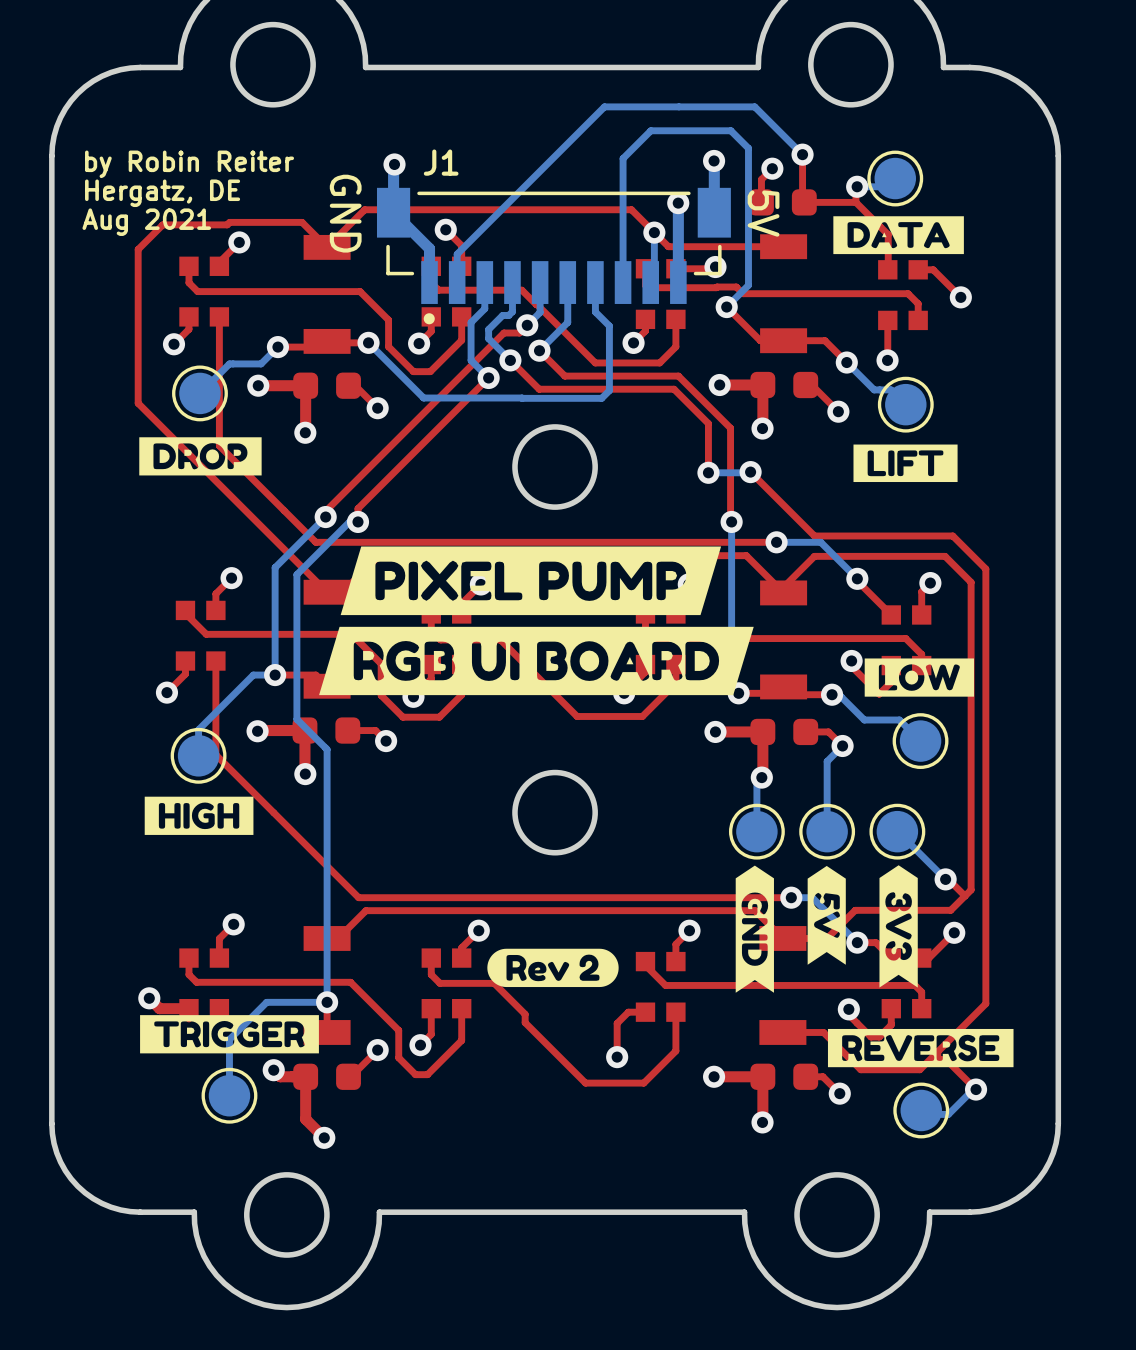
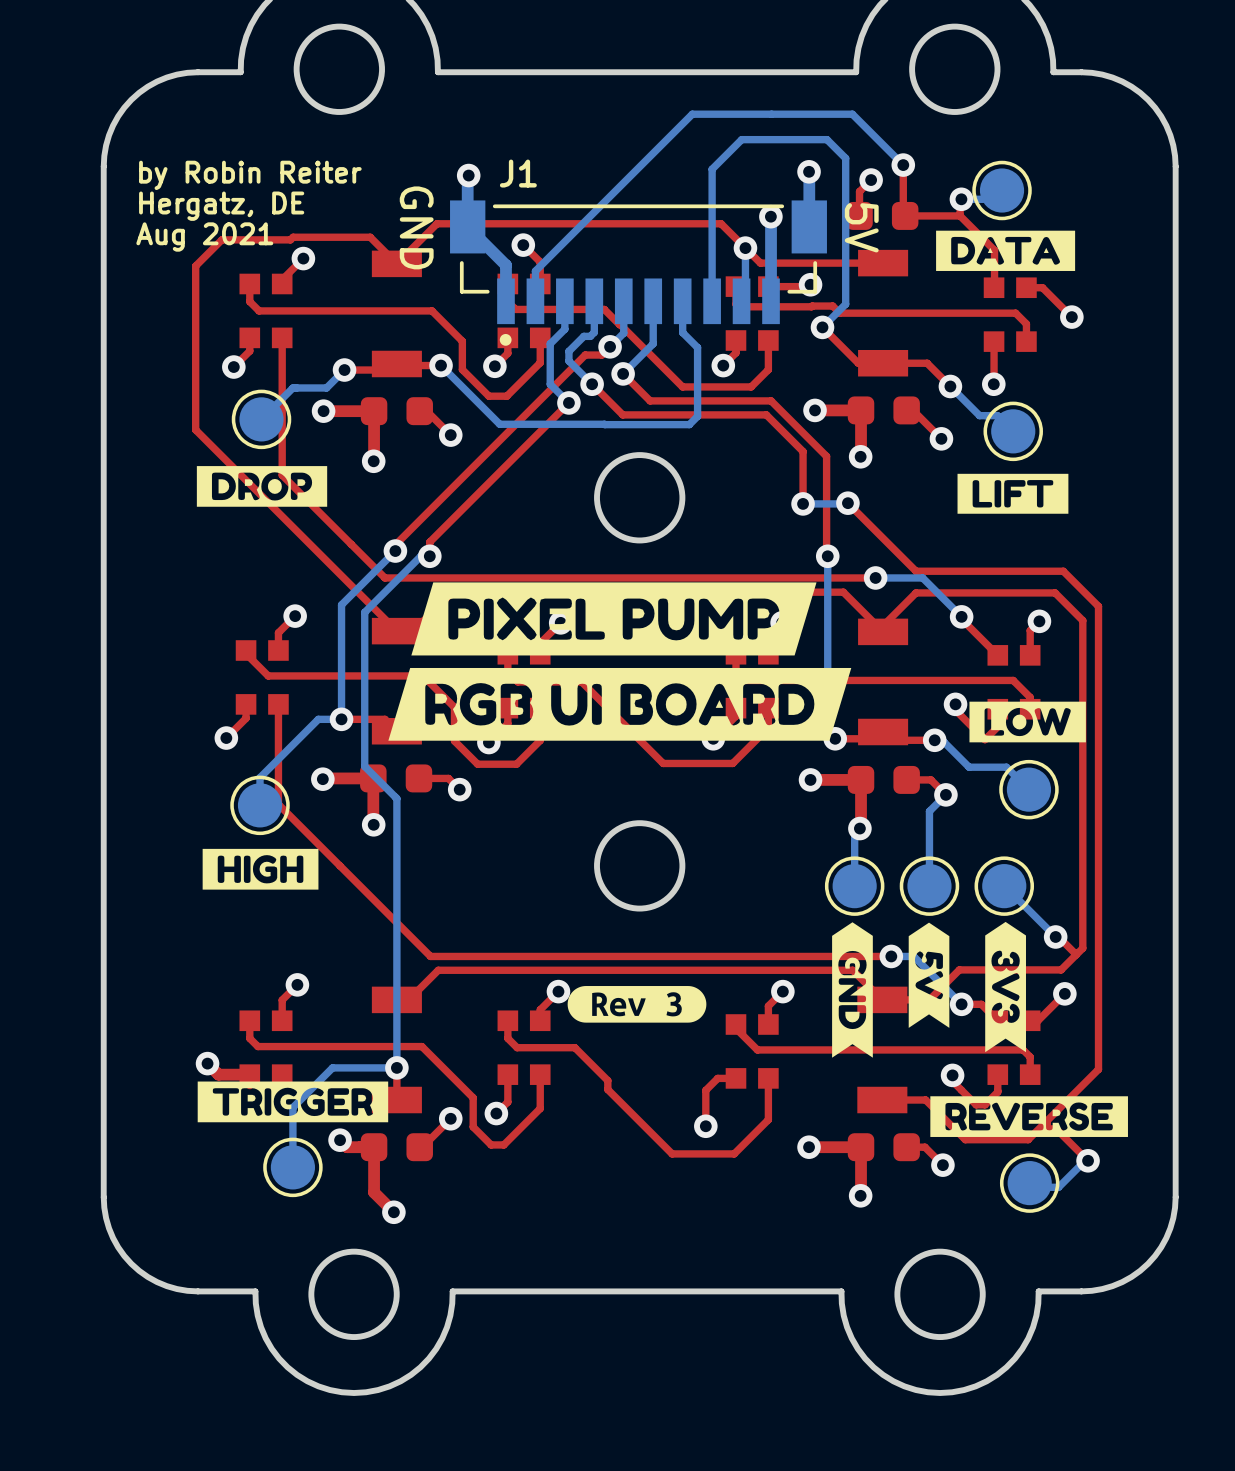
drawing shape: [487, 948, 619, 988] -> [567, 986, 707, 1023]

